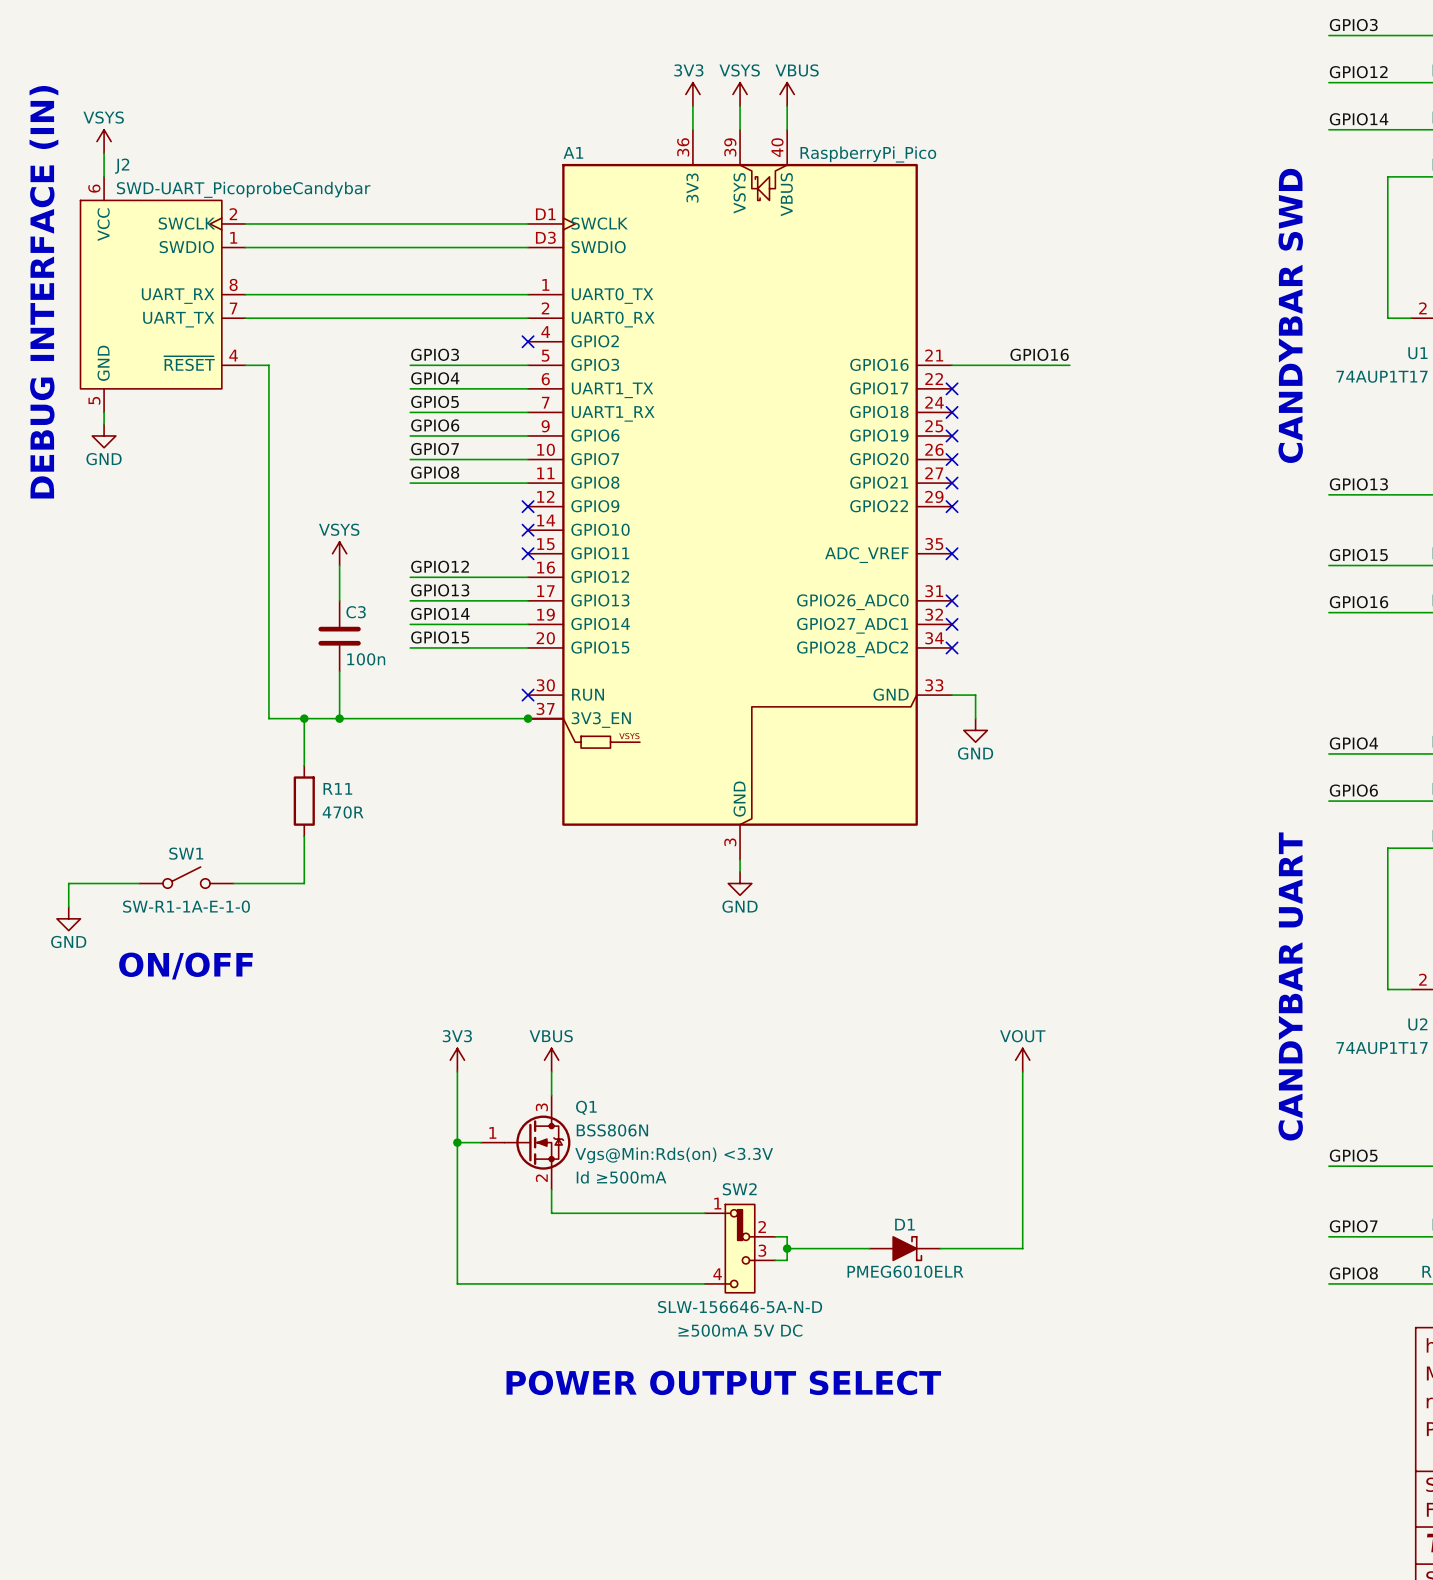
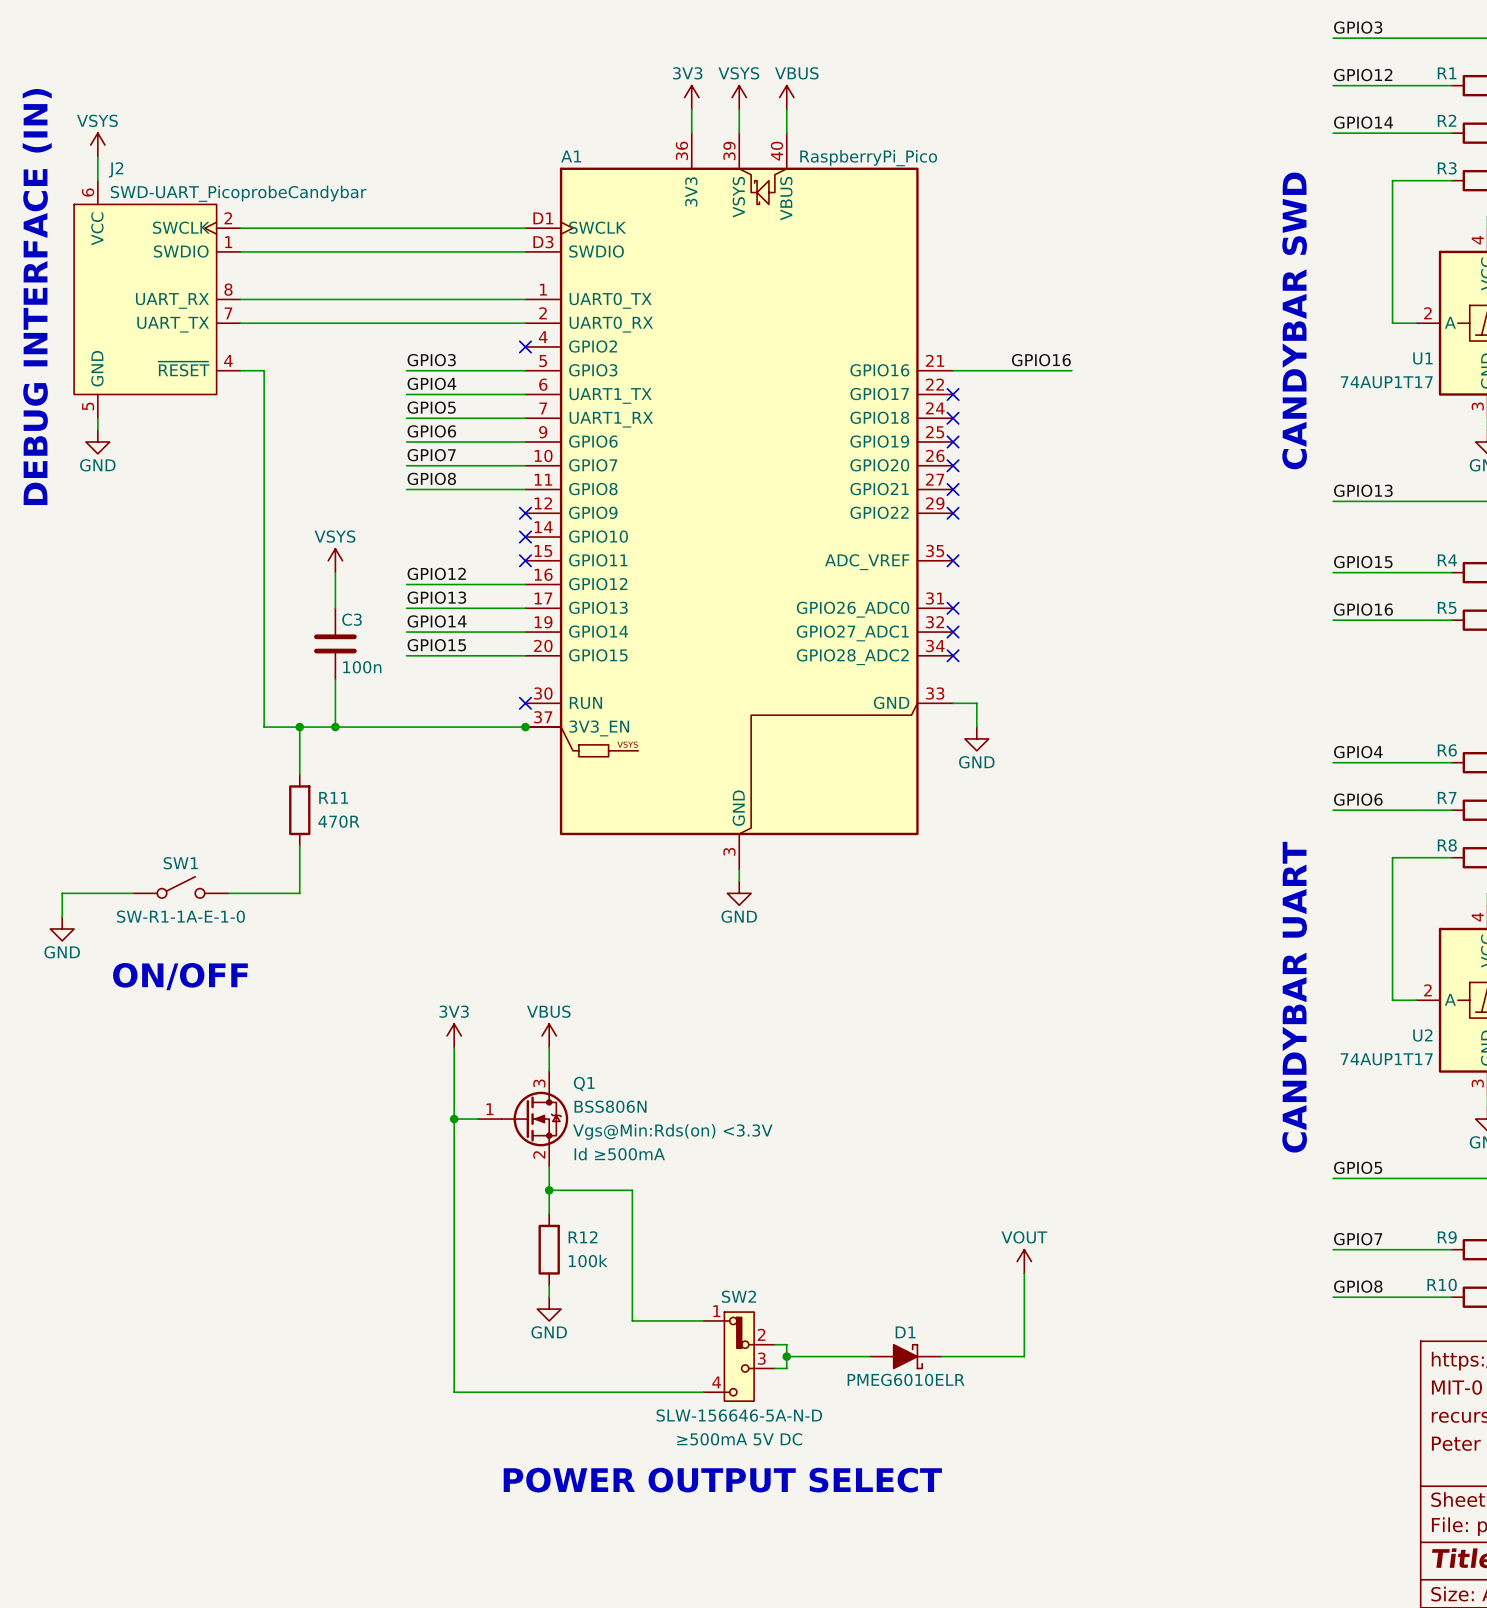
power symbol position: 3V3 (457, 1060) -> 3V3 (454, 1035)
power symbol position: VBUS (551, 1060) -> VBUS (549, 1035)
power symbol position: VOUT (1022, 1060) -> VOUT (1024, 1261)
wire: (1022, 1071) (1022, 1248) (940, 1248) -> none
wire: (457, 1142) (480, 1142) -> (454, 1119) (477, 1119)
junction position: (457, 1142) -> (454, 1119)
Q1 position: (525, 1142) -> (523, 1119)
wire: none -> (549, 1190) (632, 1190) (632, 1320) (703, 1320)
junction: none -> (549, 1190)
wire: (551, 1201) (551, 1213) (704, 1213) -> none
R12: none -> 100k (549, 1249)
wire: (775, 1236) (787, 1236) (787, 1260) (775, 1260) -> (774, 1344) (786, 1344) (786, 1368) (774, 1368)
SW2 position: (740, 1248) -> (739, 1356)
wire: (787, 1248) (869, 1248) -> (786, 1356) (869, 1356)
junction: (787, 1248) -> none
D1 position: (904, 1248) -> (905, 1356)
wire: none -> (1024, 1273) (1024, 1356) (941, 1356)
wire: none -> (549, 1285) (549, 1297)
wire: (457, 1283) (704, 1283) -> (454, 1297) (454, 1392) (703, 1392)
power symbol: none -> GND (549, 1309)
junction: none -> (786, 1356)
text position: POWER OUTPUT SELECT (723, 1382) -> POWER OUTPUT SELECT (722, 1480)

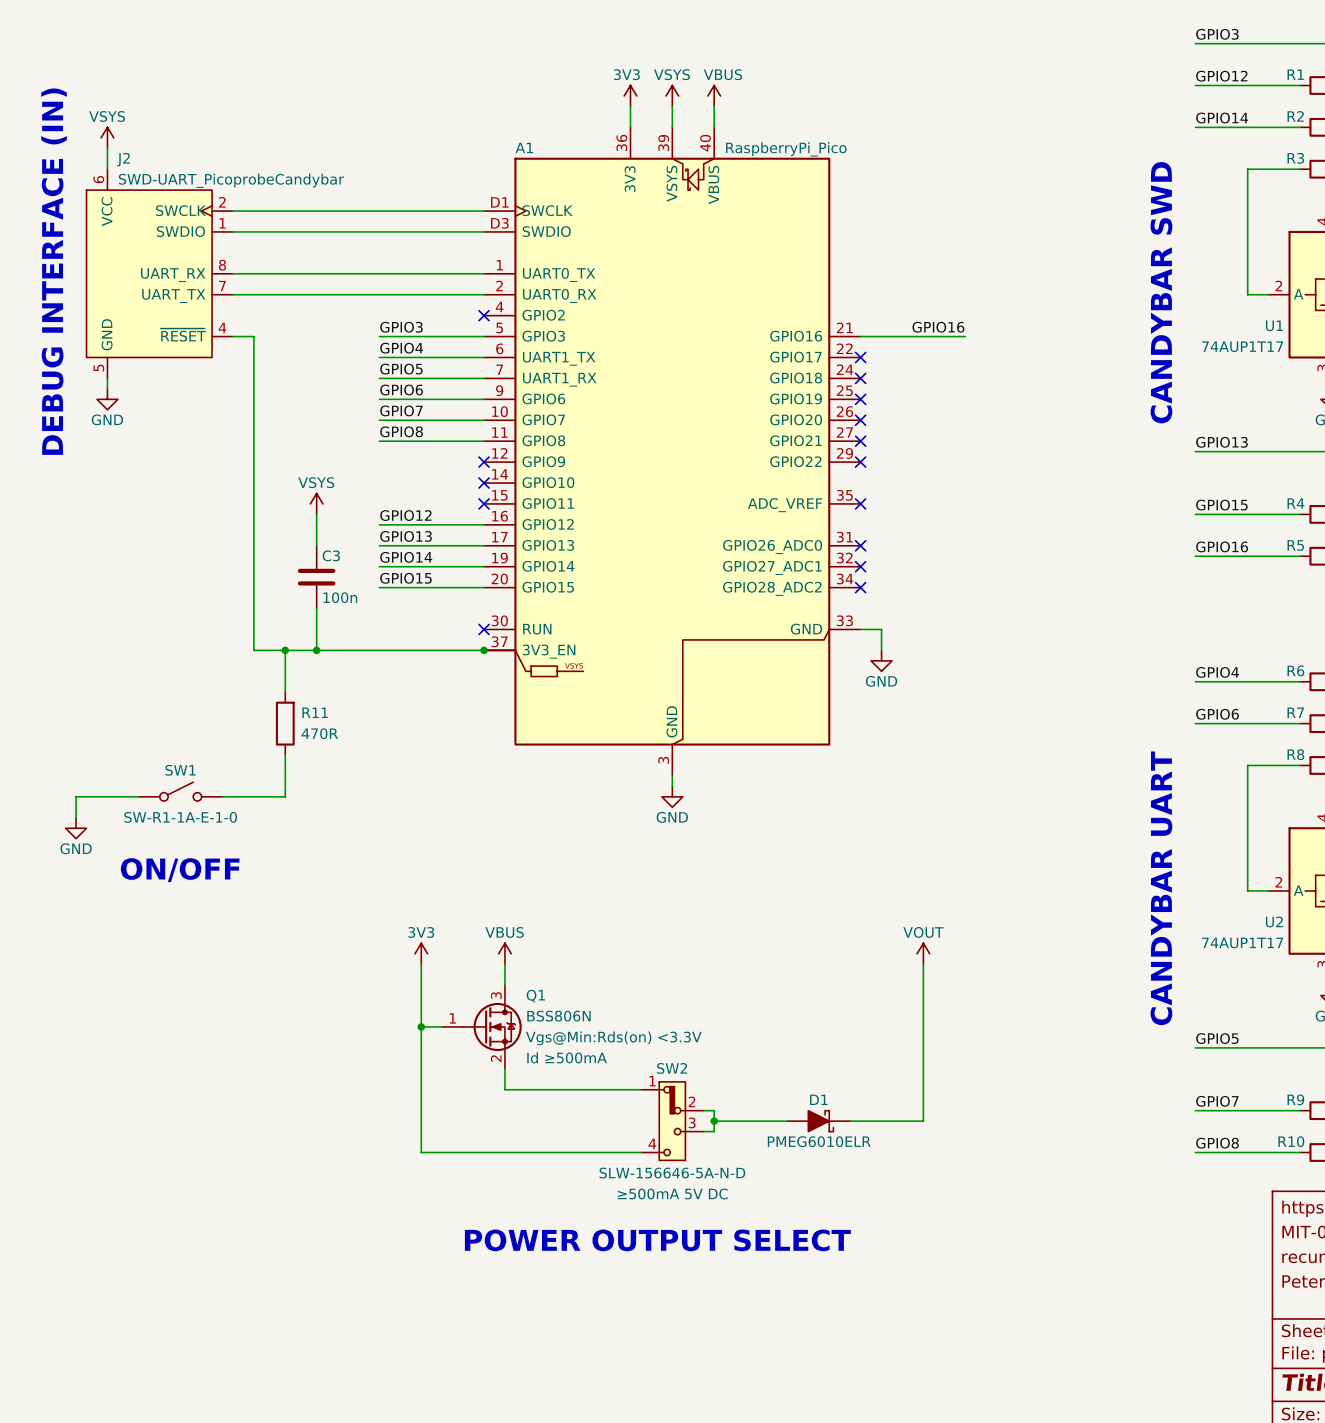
power symbol position: 3V3 (454, 1035) -> 3V3 (421, 953)
power symbol position: VBUS (549, 1035) -> VBUS (504, 953)
wire: none -> (923, 964) (923, 1121) (850, 1121)
wire: (454, 1119) (477, 1119) -> (421, 1026) (442, 1026)
junction position: (454, 1119) -> (421, 1026)
Q1 position: (523, 1119) -> (481, 1026)
wire: (549, 1190) (632, 1190) (632, 1320) (703, 1320) -> none
junction: (549, 1190) -> none
wire: none -> (504, 1079) (504, 1089) (640, 1089)
R12: 100k (549, 1249) -> none
junction: none -> (714, 1121)
power symbol position: VOUT (1024, 1261) -> VOUT (923, 953)
wire: (1024, 1273) (1024, 1356) (941, 1356) -> none
wire: (549, 1285) (549, 1297) -> none
wire: (454, 1297) (454, 1392) (703, 1392) -> (421, 1152) (640, 1152)
power symbol: GND (549, 1309) -> none
wire: (774, 1344) (786, 1344) (786, 1368) (774, 1368) -> (703, 1110) (714, 1110) (714, 1131) (703, 1131)
SW2 position: (739, 1356) -> (672, 1121)
wire: (786, 1356) (869, 1356) -> (714, 1121) (787, 1121)
junction: (786, 1356) -> none
D1 position: (905, 1356) -> (818, 1121)
text position: POWER OUTPUT SELECT (722, 1480) -> POWER OUTPUT SELECT (657, 1240)

